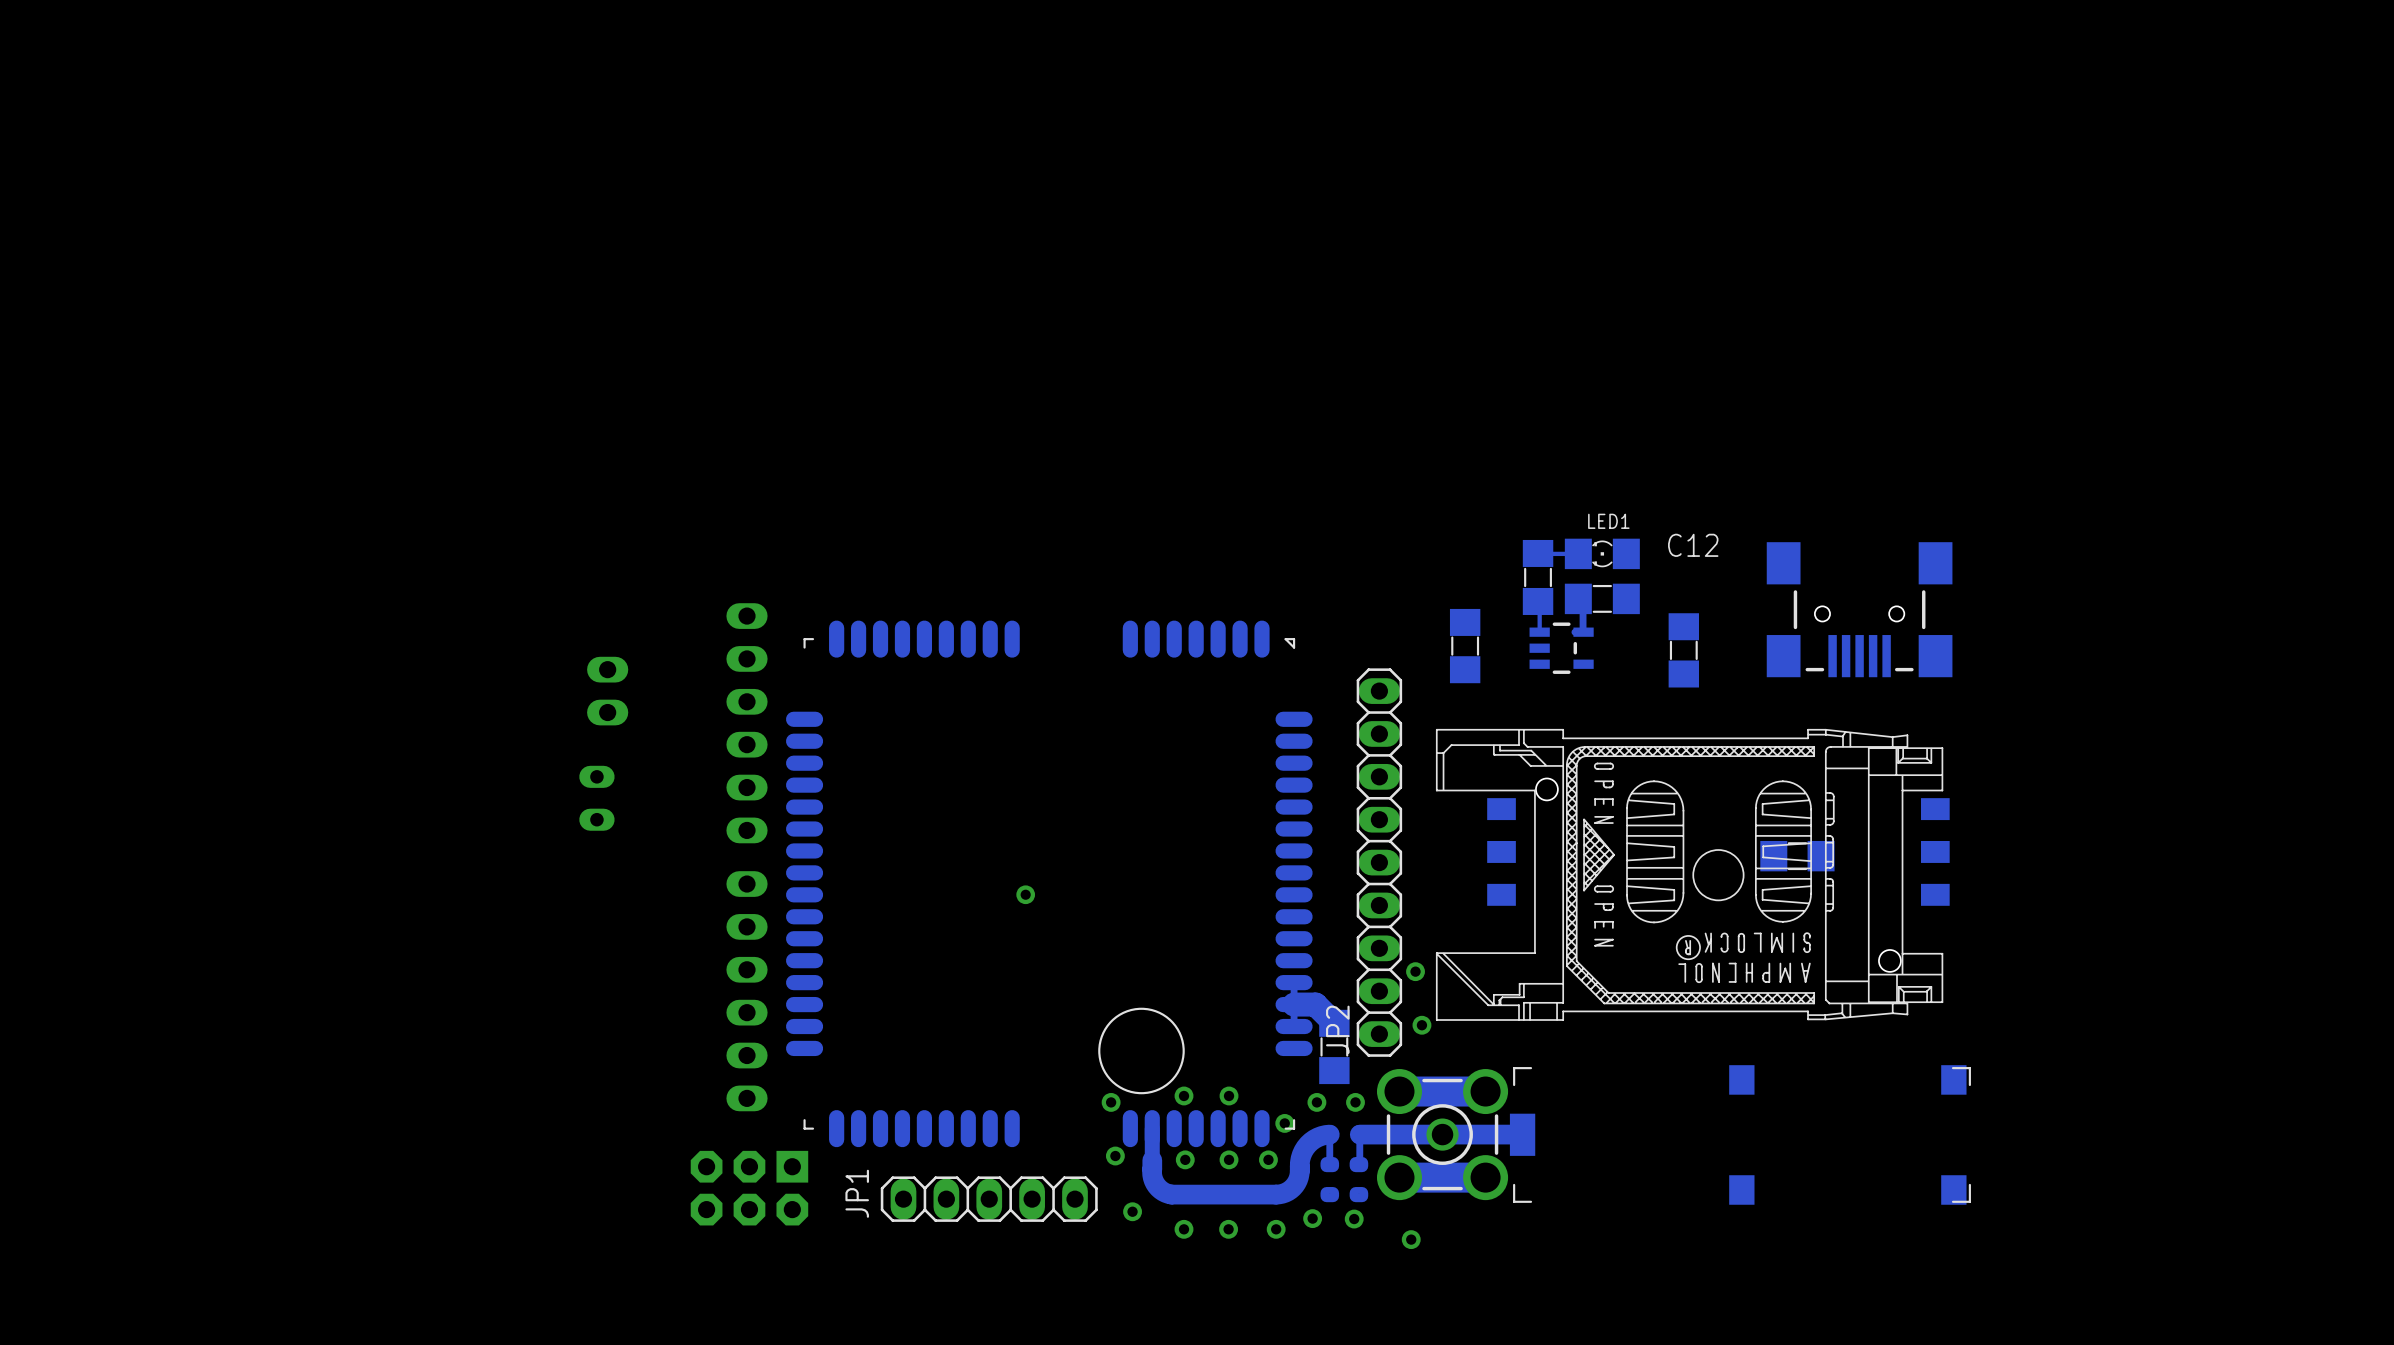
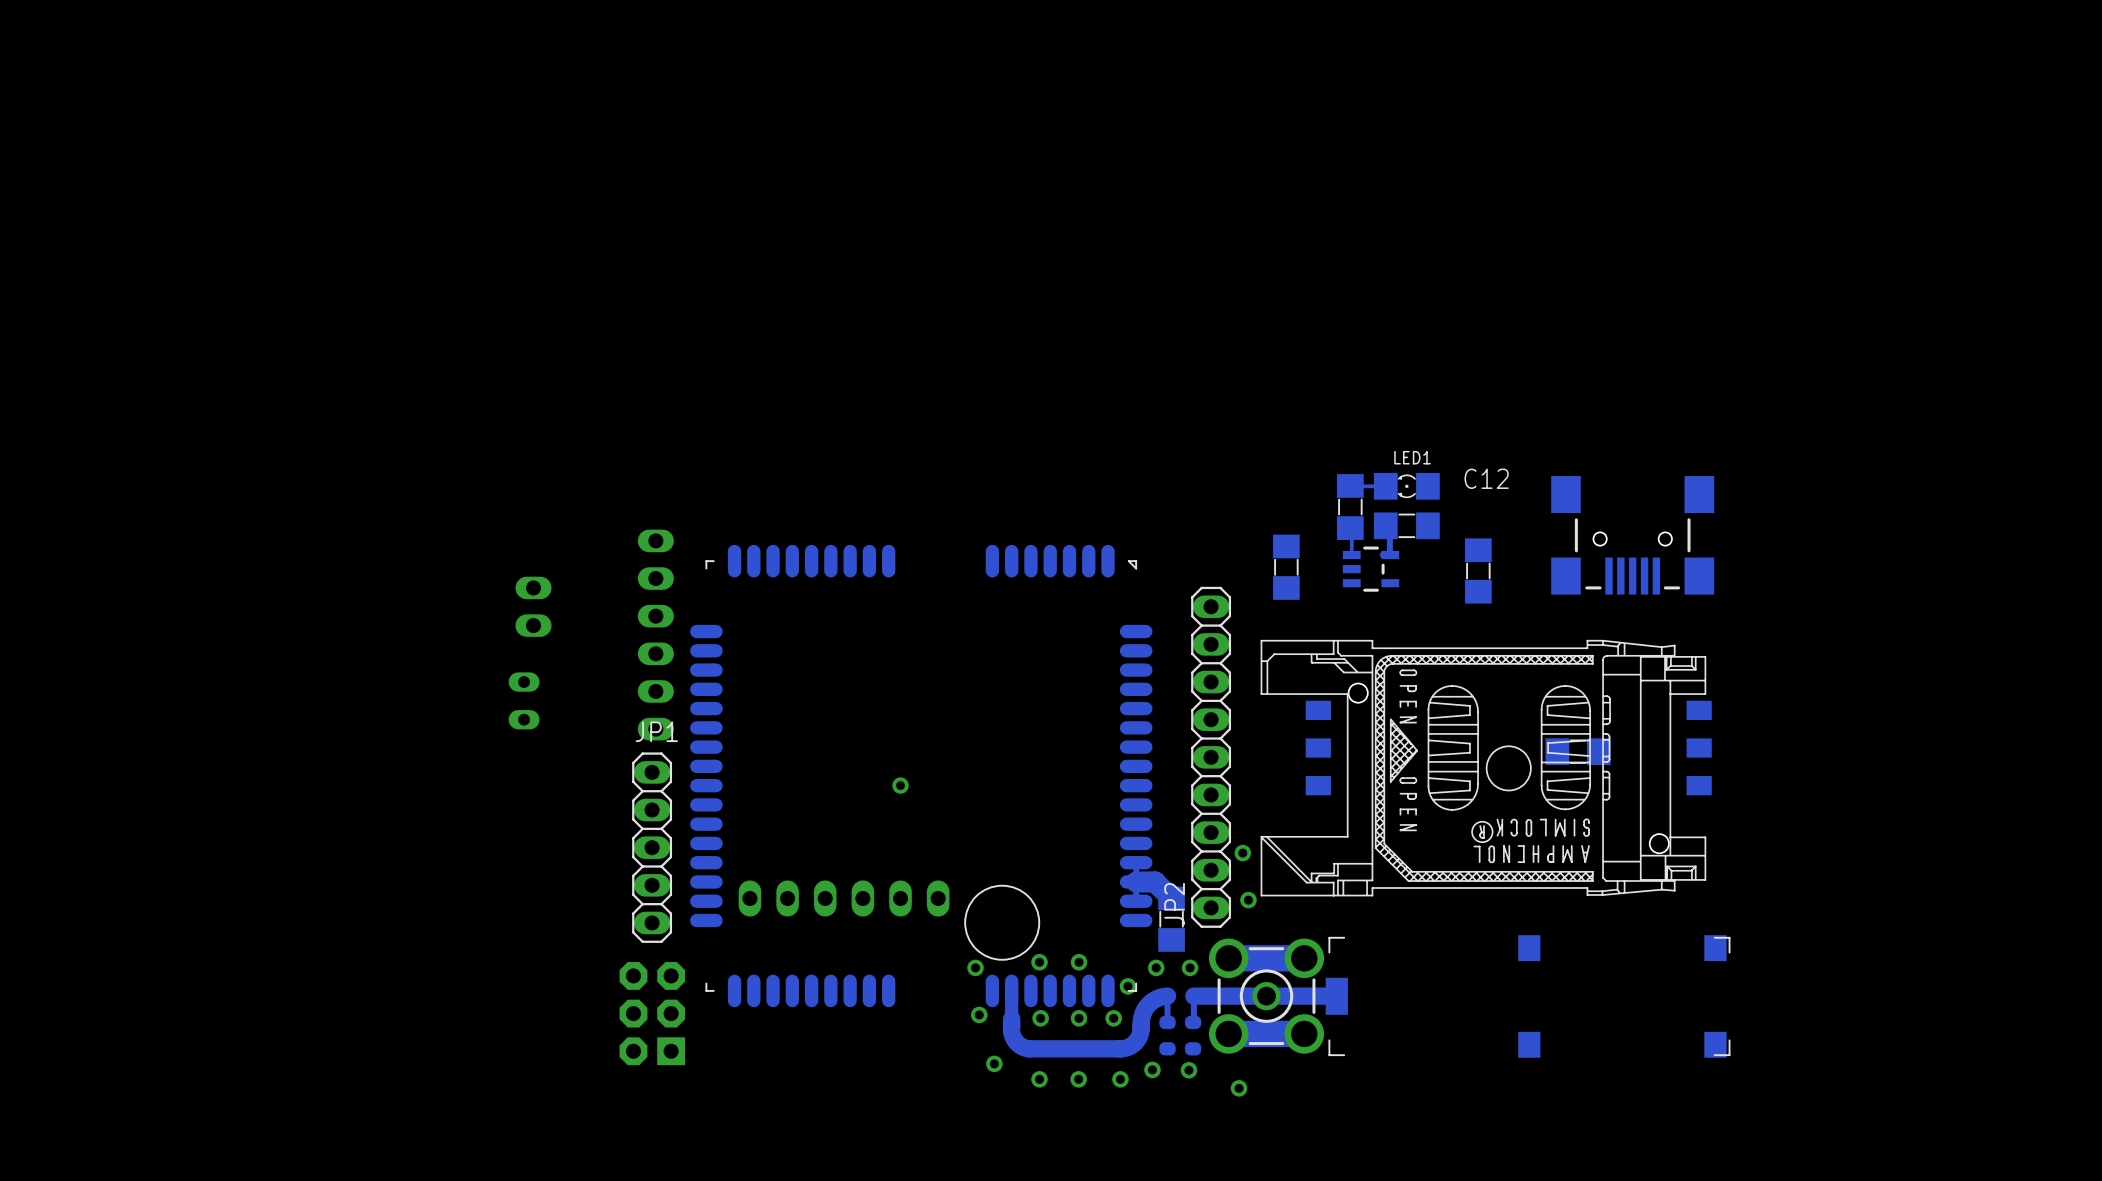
part rotation: 0° (747, 991) -> 90° clockwise (844, 898)
part position: (747, 991) -> (844, 898)
part rotation: 0° (749, 1188) -> 90° clockwise (652, 1013)
JP1 rotation: 0° (989, 1199) -> 90° clockwise (652, 847)
JP1 position: (989, 1199) -> (652, 847)

